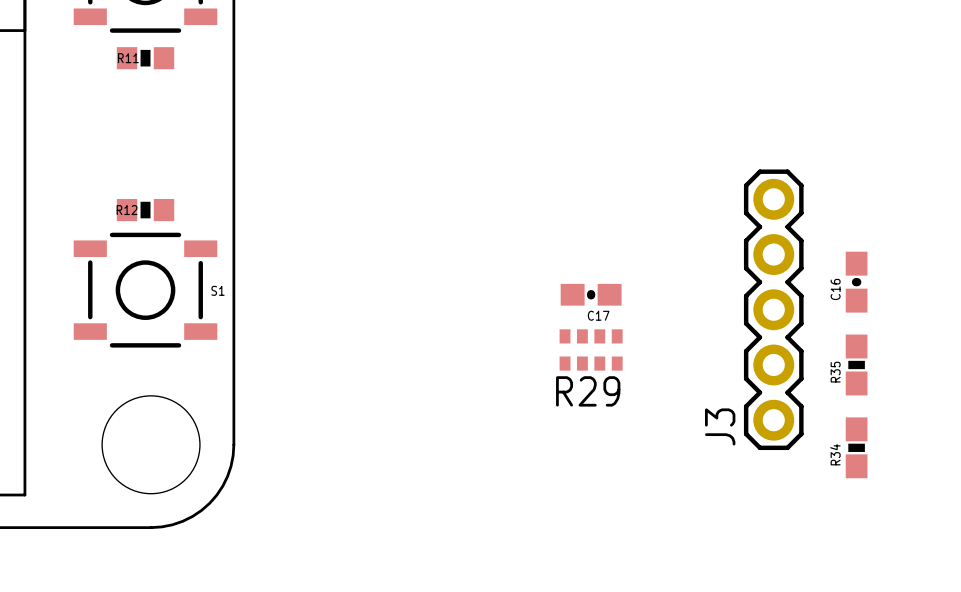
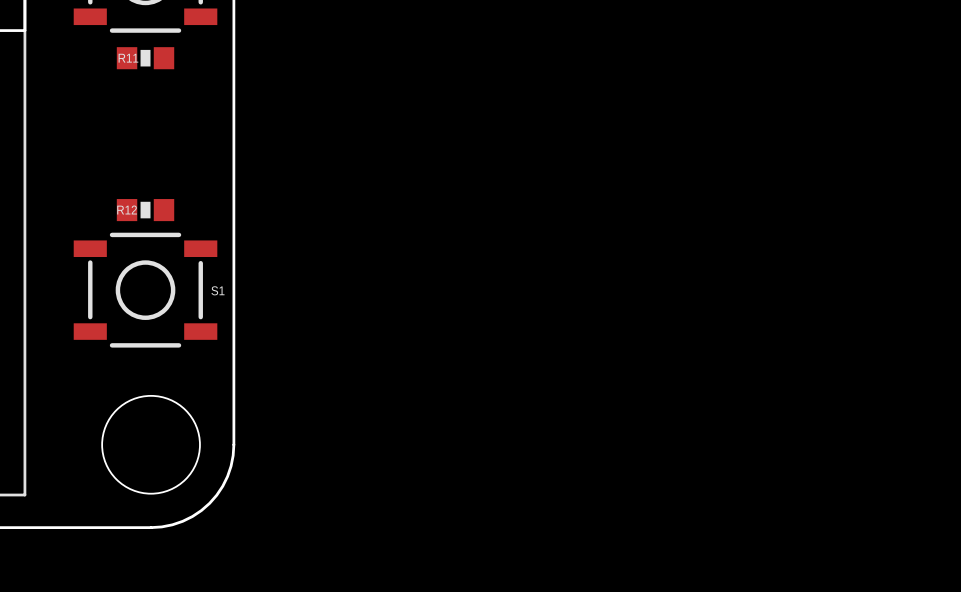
C16: (856, 282) -> none
C17: (591, 294) -> none
J3: (773, 309) -> none
R29: (591, 349) -> none
R35: (856, 364) -> none
R34: (856, 447) -> none

